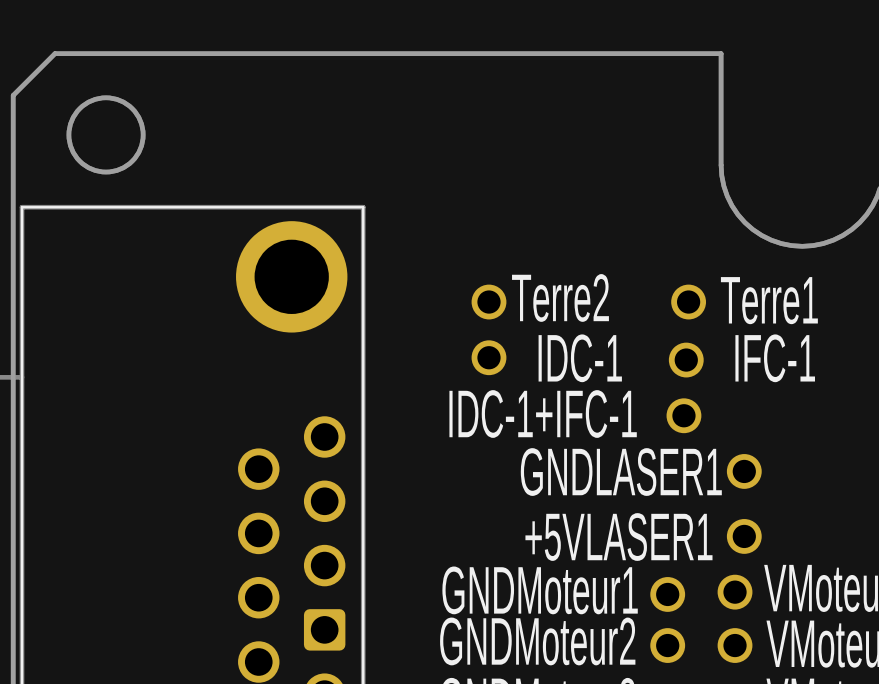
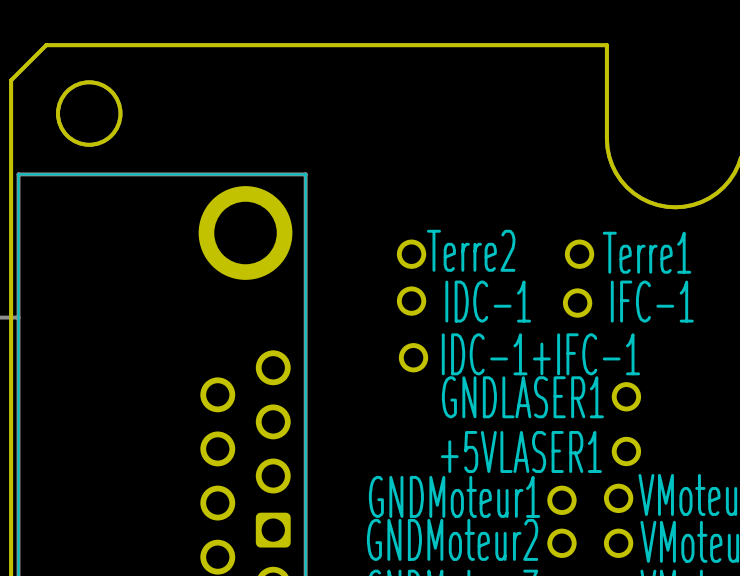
IDC-1+IFC-1 name position: IDC-1+IFC-1 (543, 414) -> IDC-1+IFC-1 (540, 354)
IDC-1+IFC-1 position: (683, 415) -> (413, 357)

